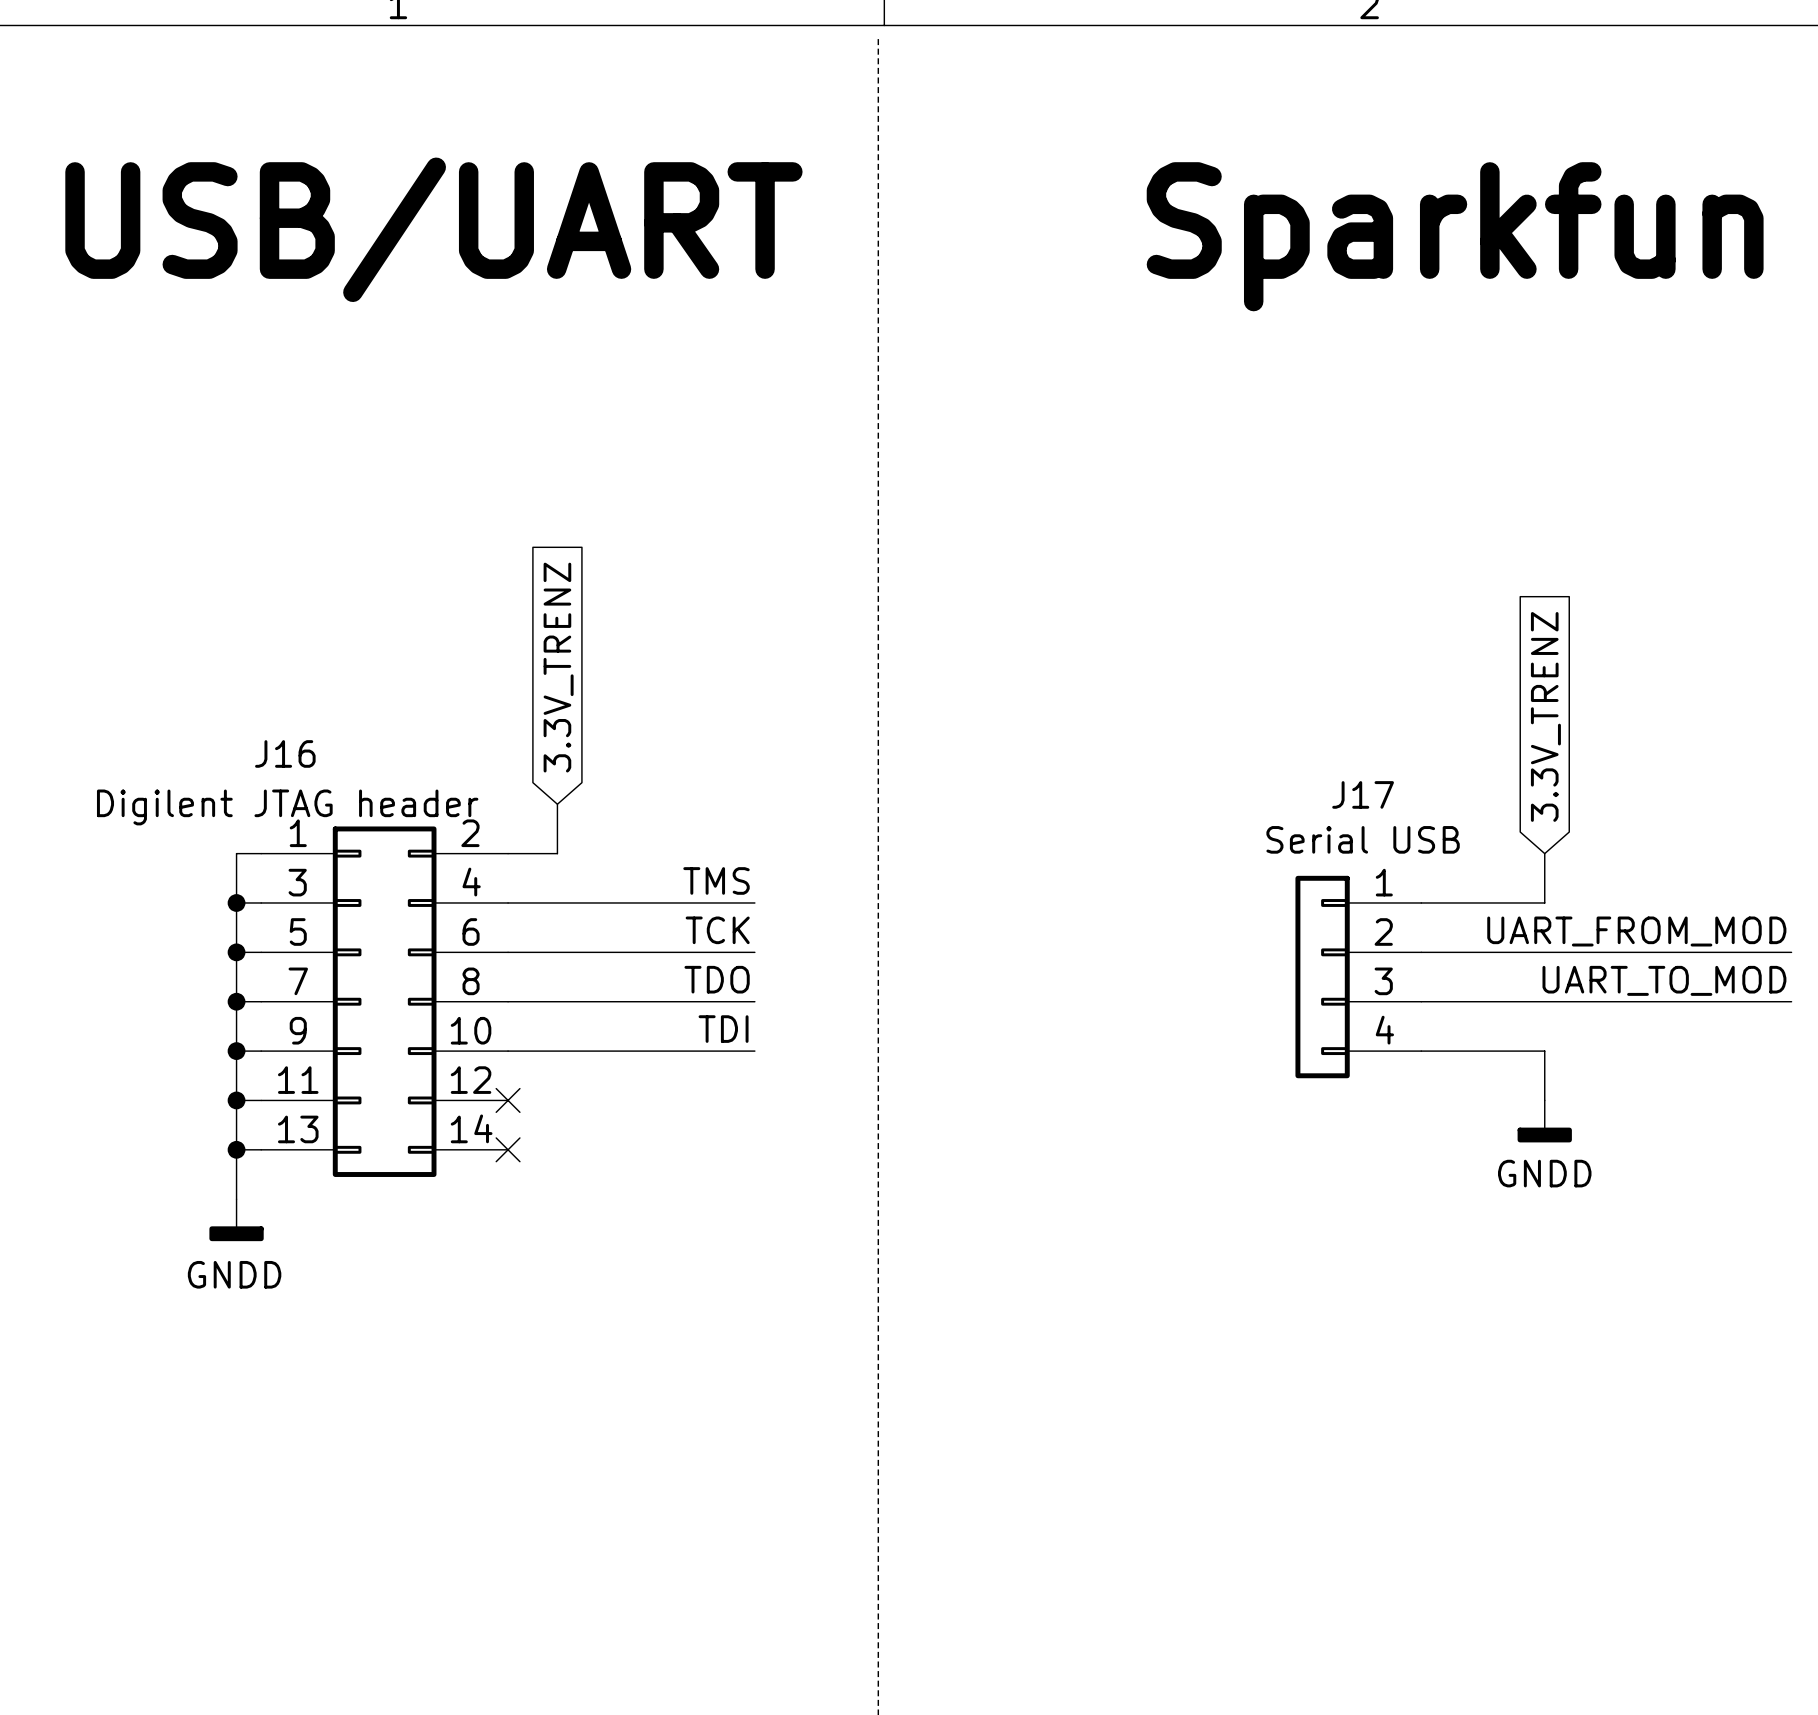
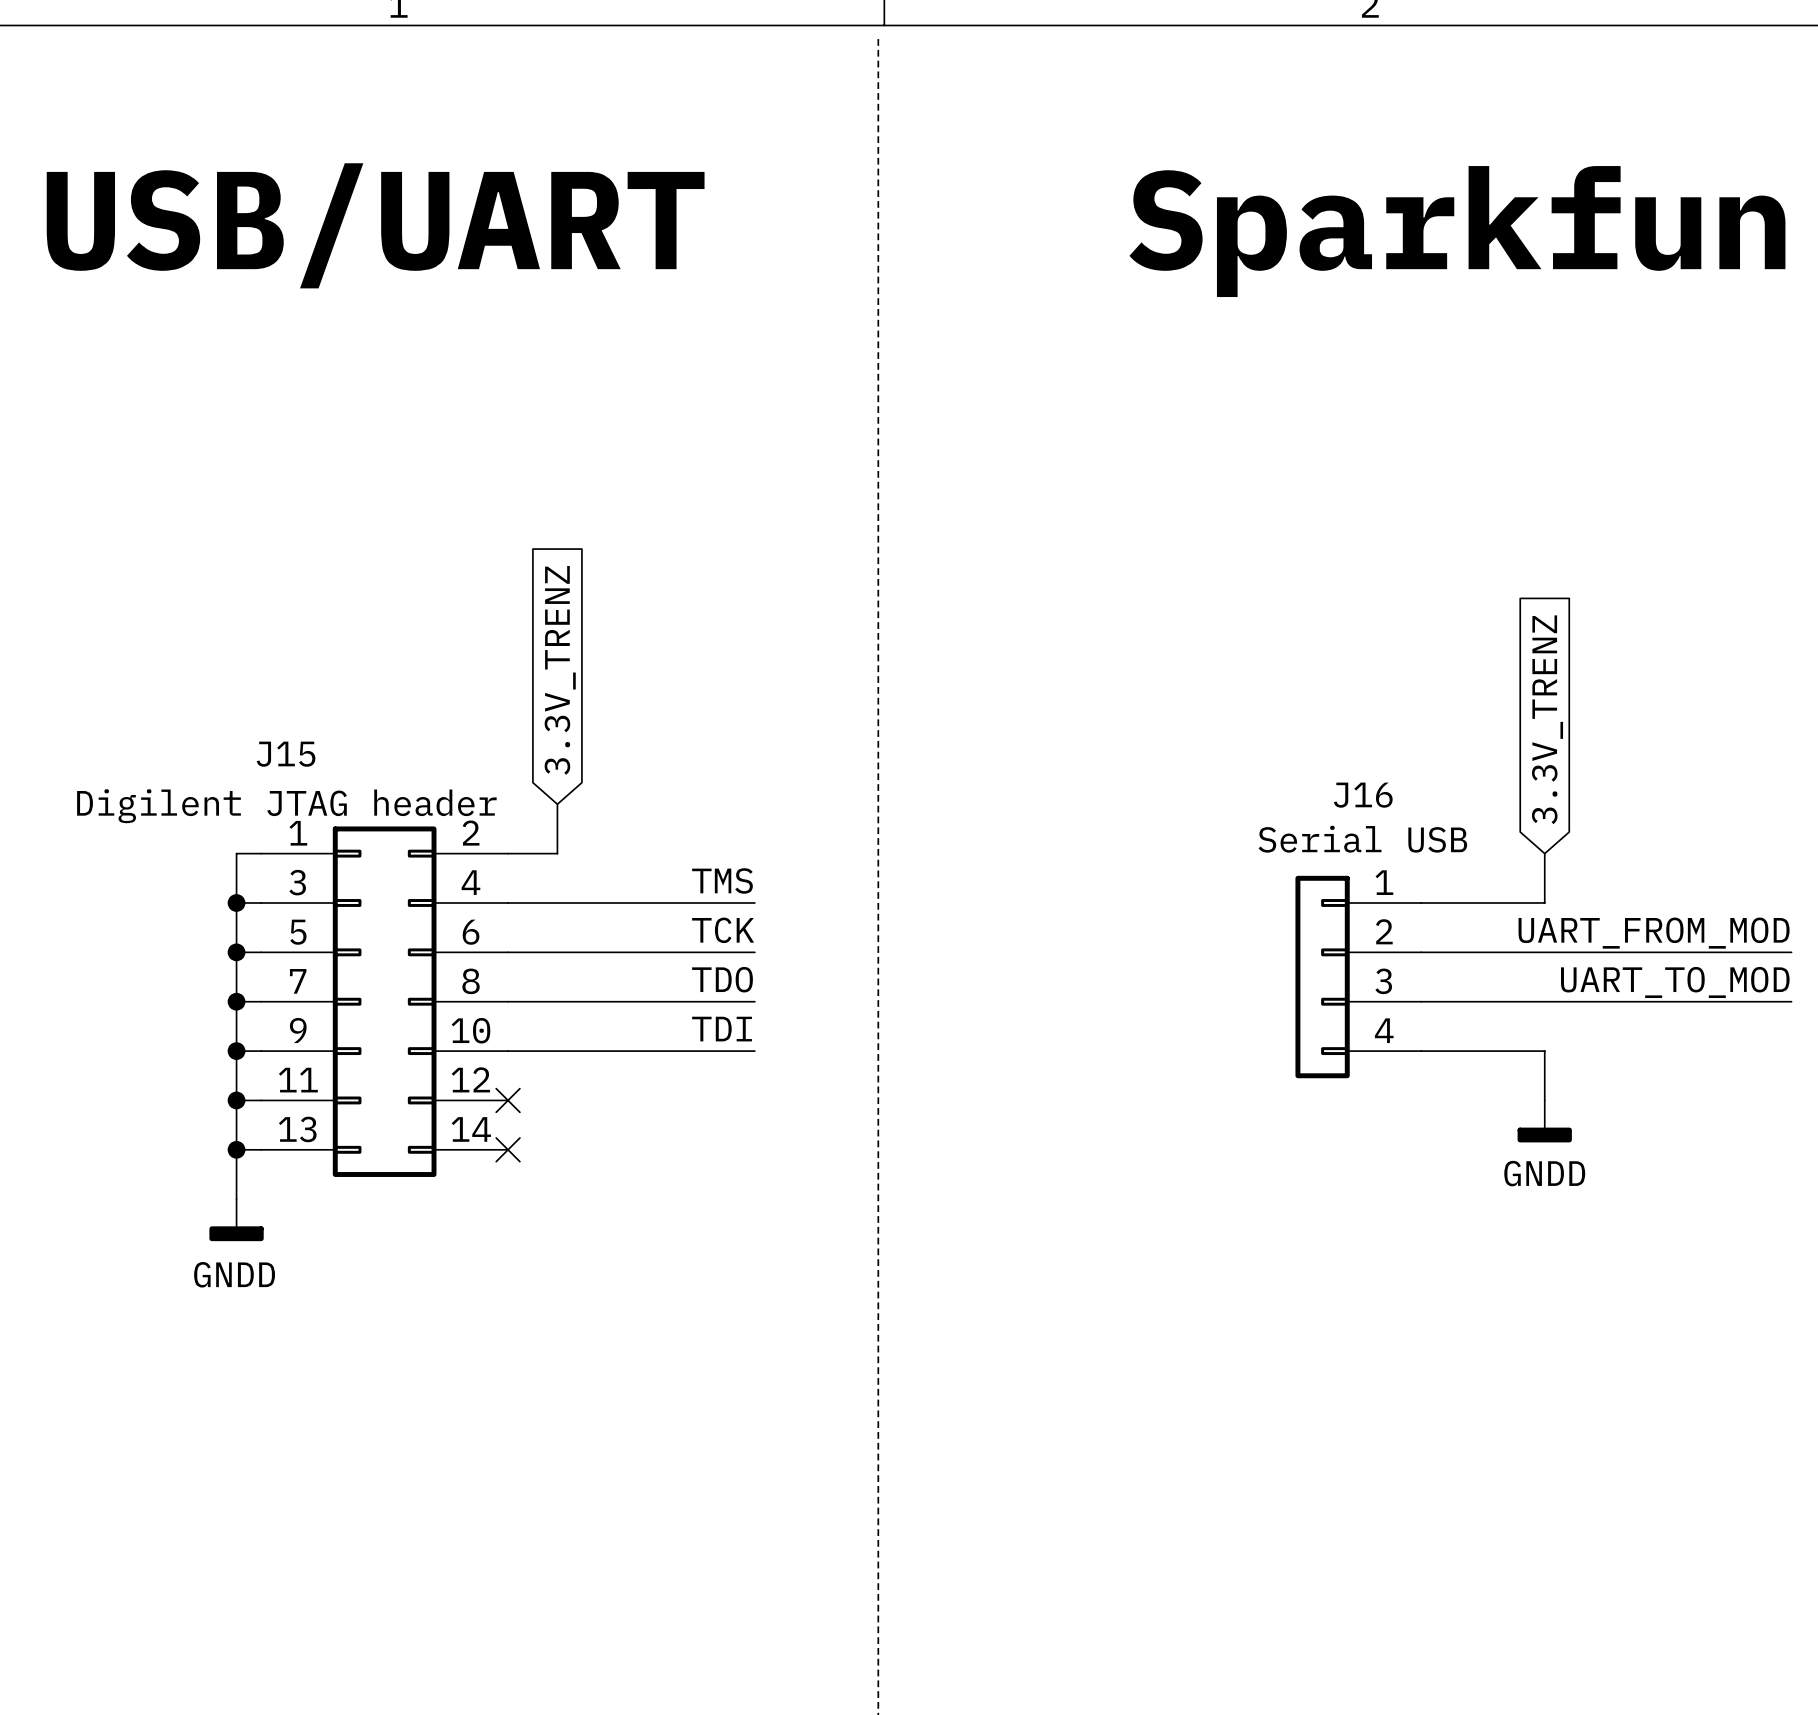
J16 name: J16 (285, 753) -> J15 (286, 754)
J17 name: J17 (1363, 794) -> J16 (1363, 795)

